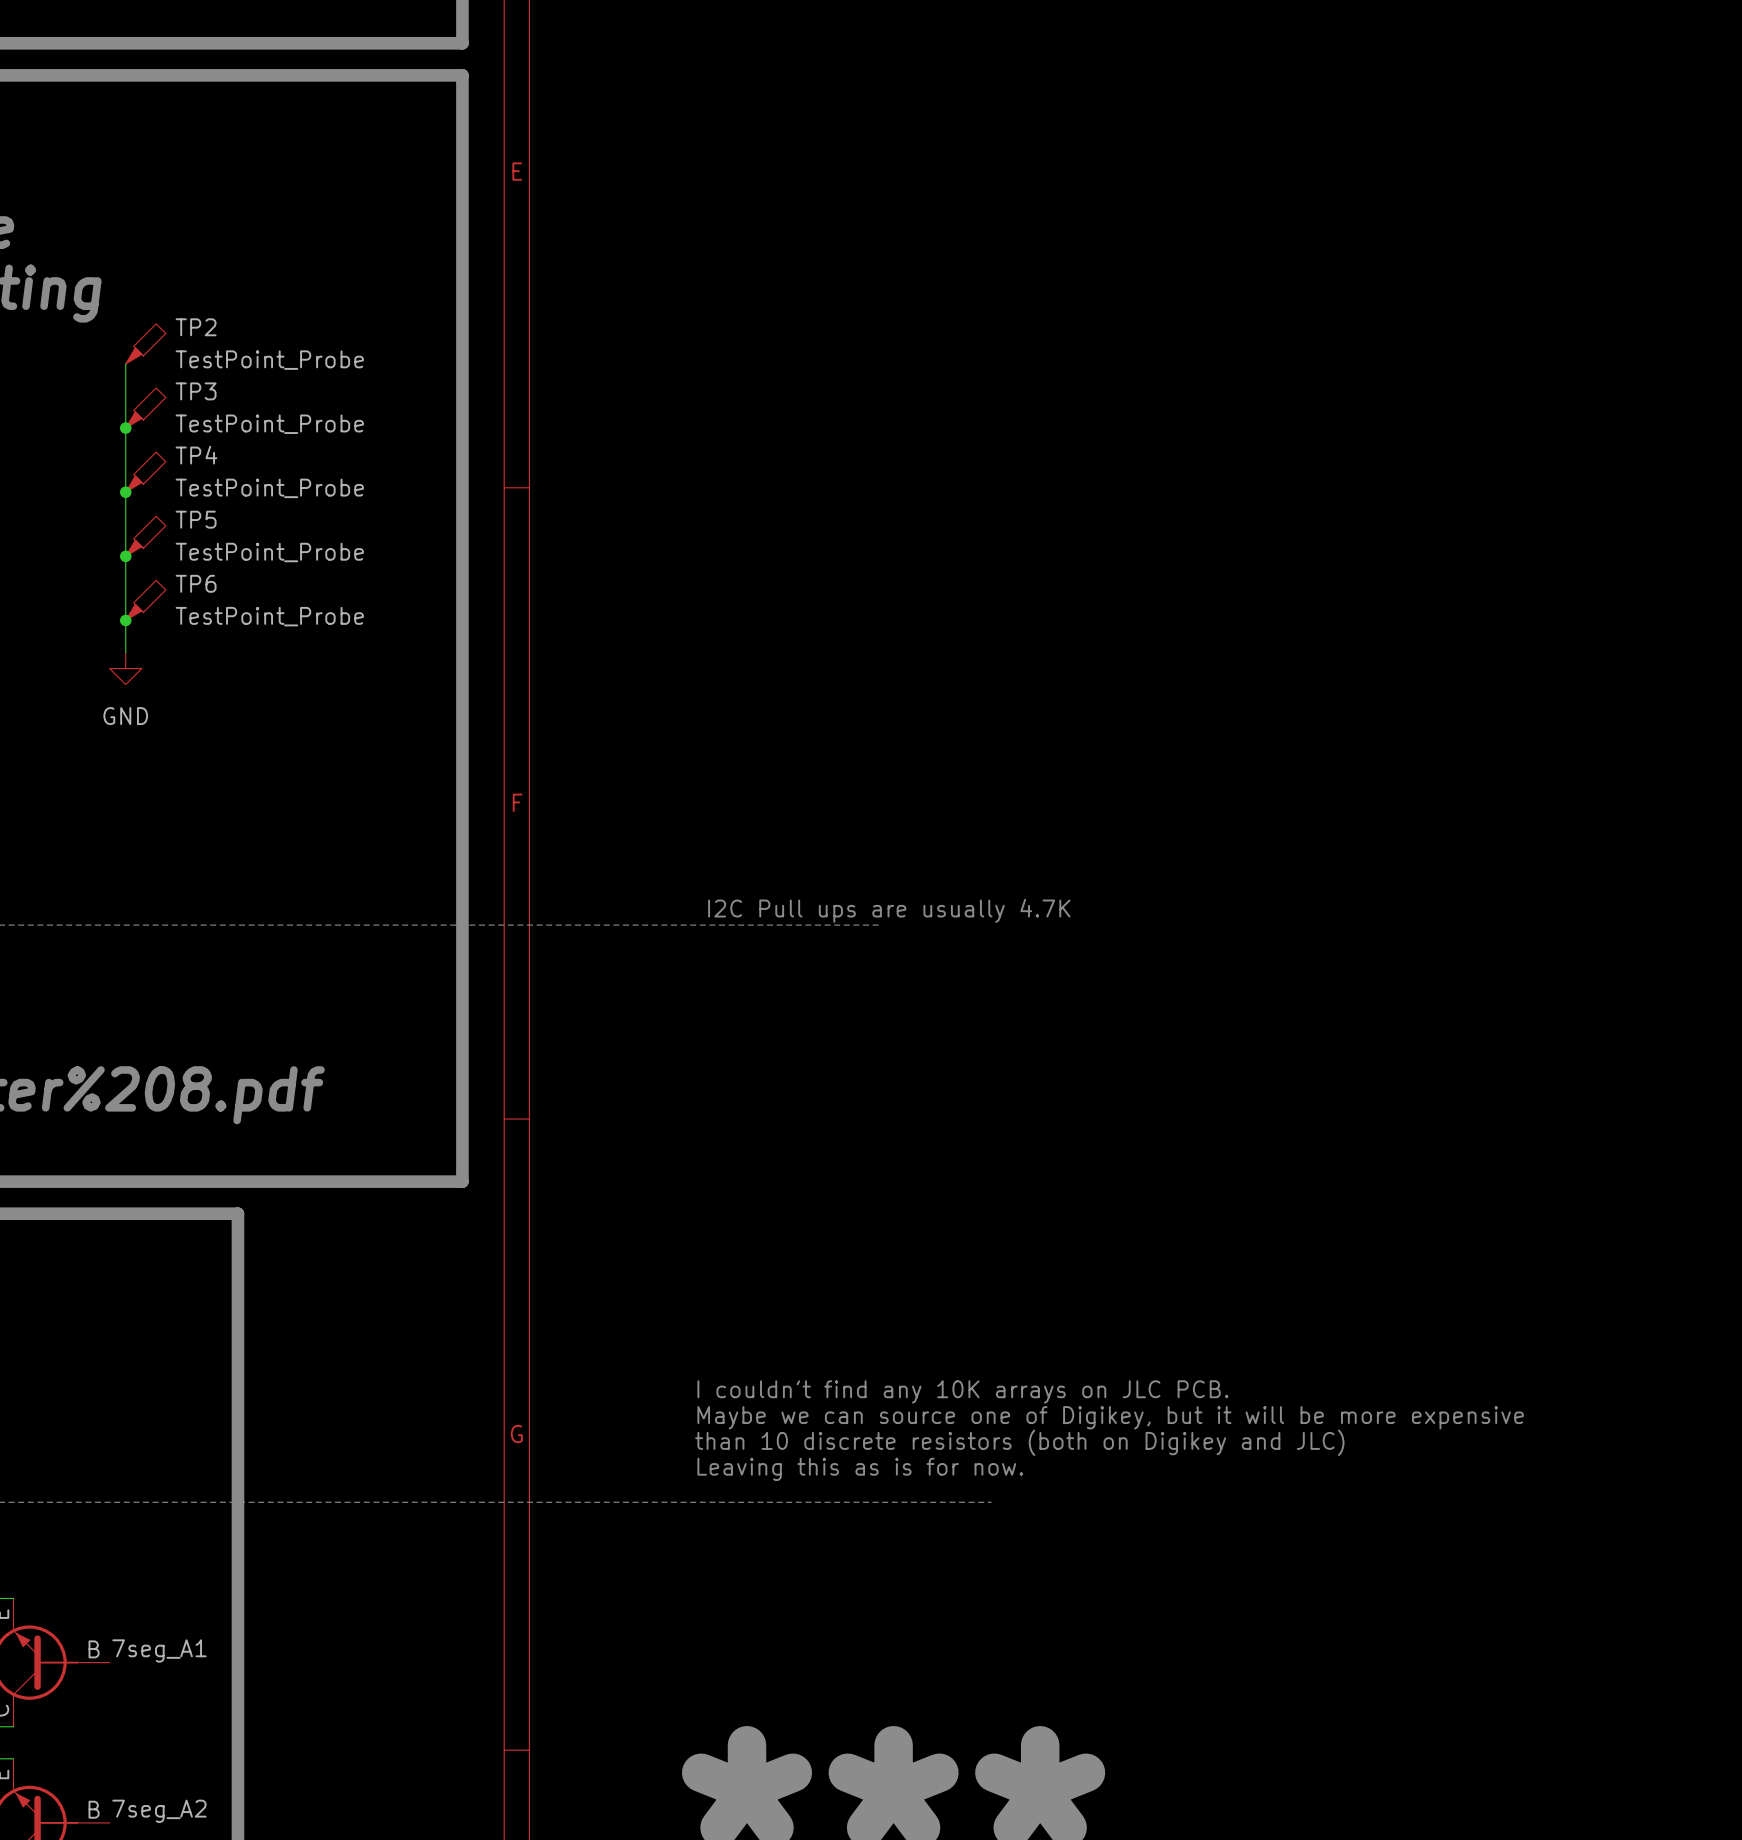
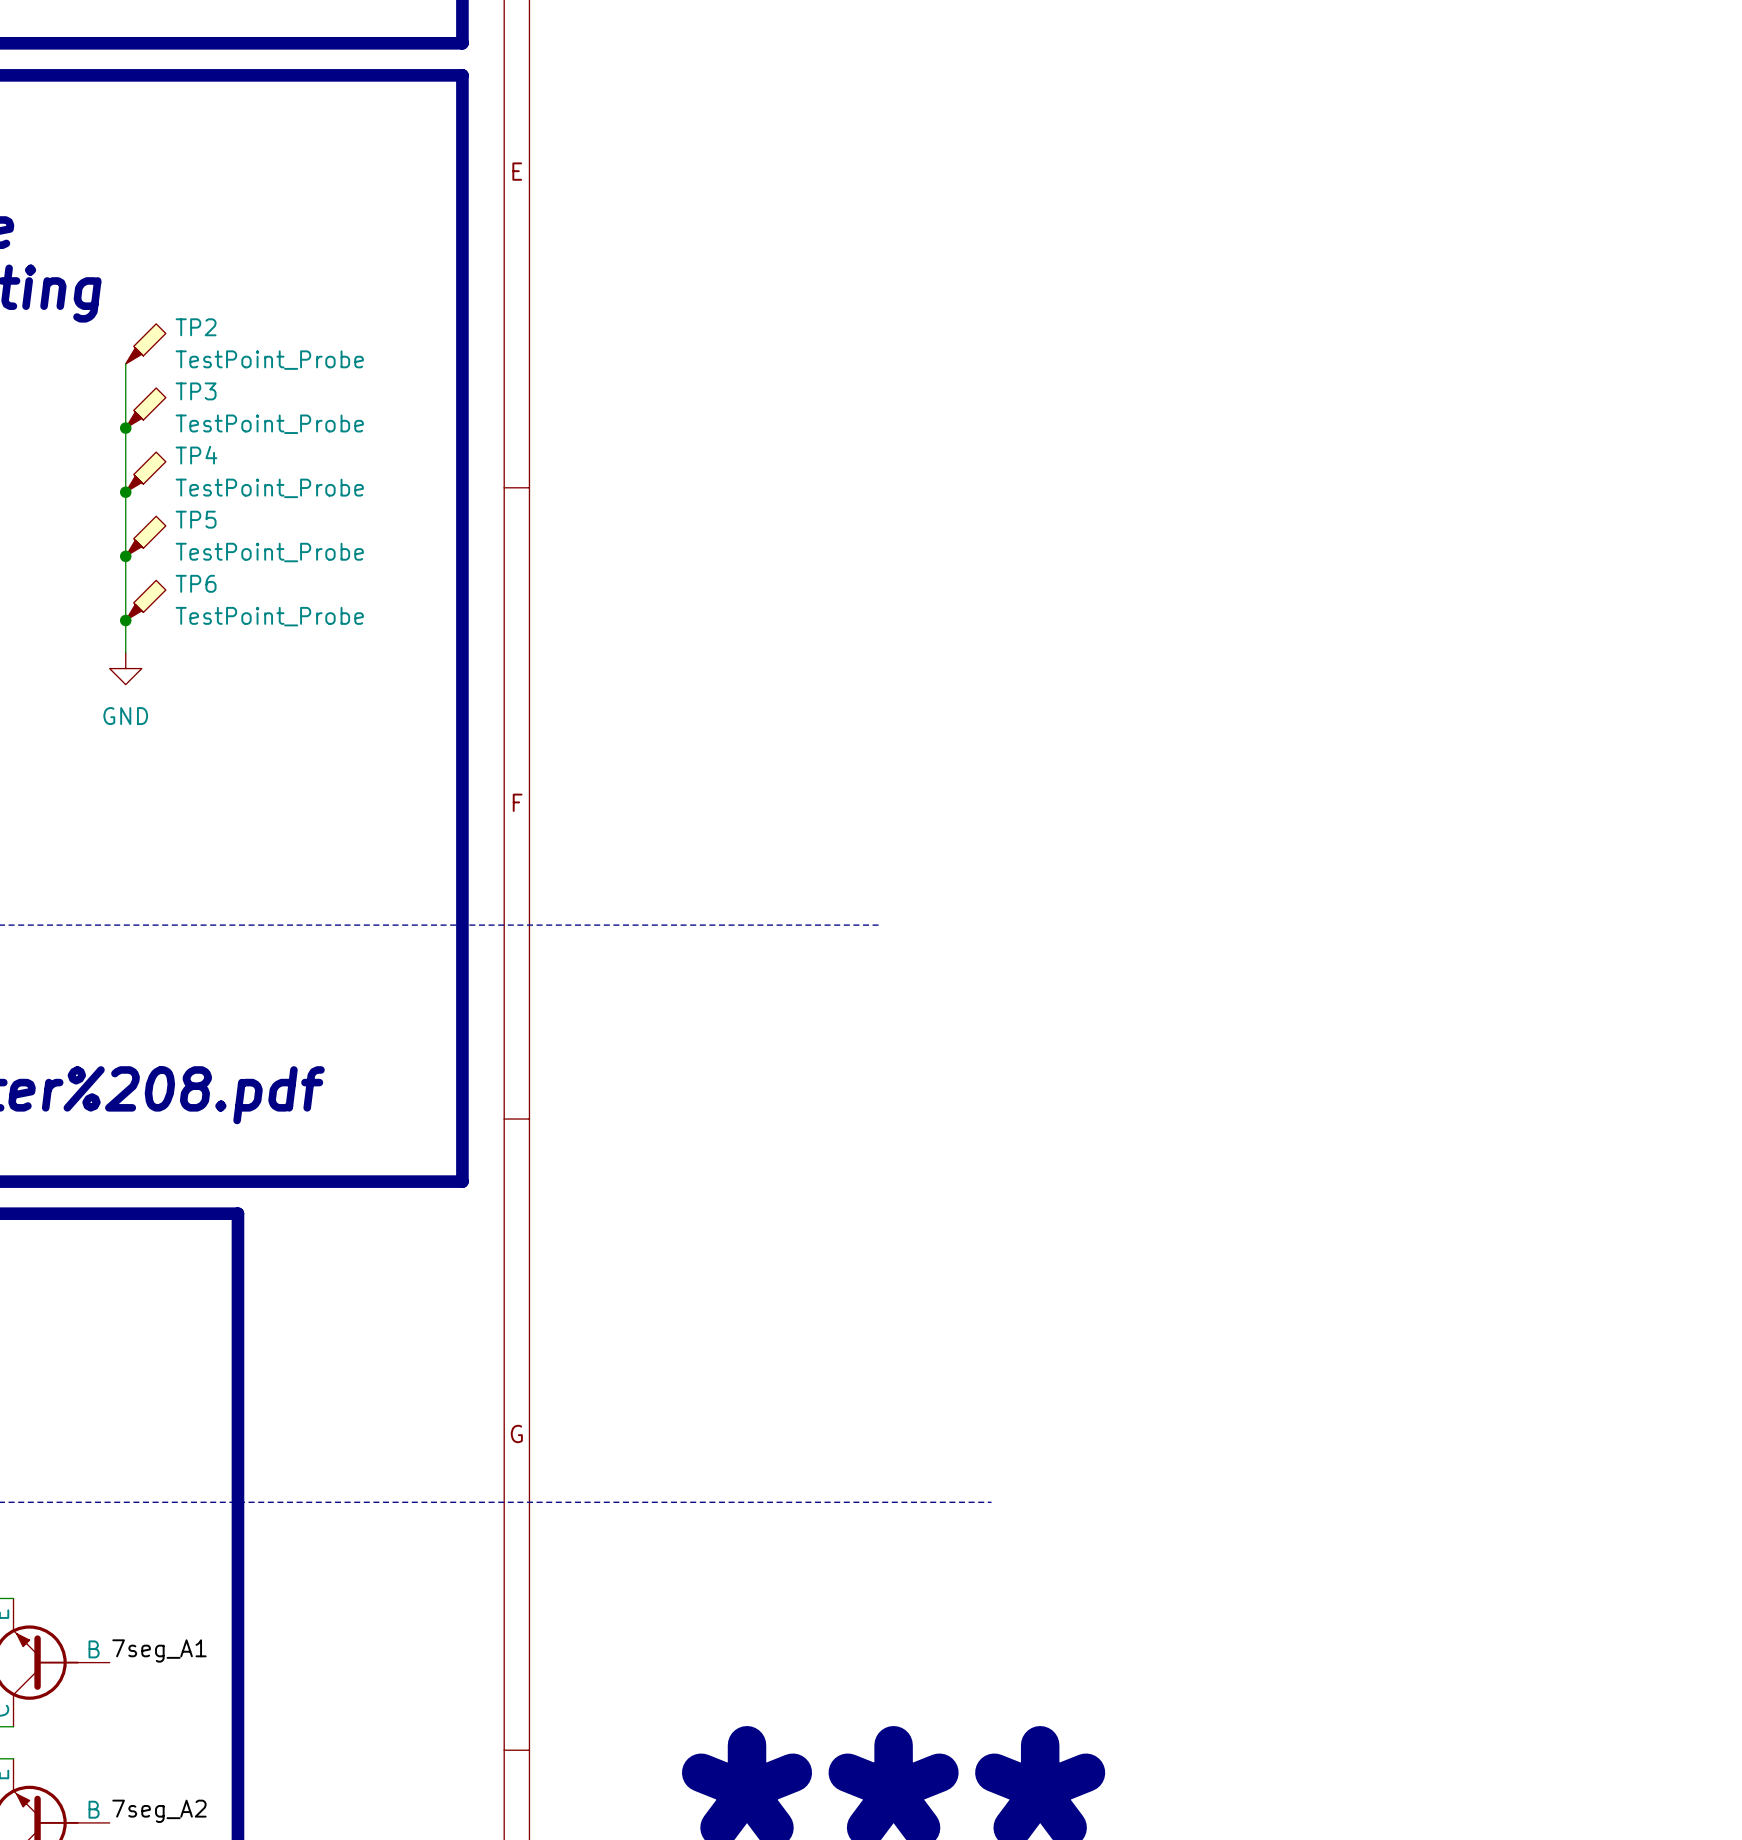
text: I2C Pull ups are usually 4.7K (889, 910) -> none
text: I couldn't find any 10K arrays on JLC PCB. (962, 1391) -> none
text: Maybe we can source one of Digikey, but it will be more expensive (1110, 1417) -> none
text: than 10 discrete resistors (both on Digikey and JLC) (1019, 1442) -> none
text: Leaving this as is for now. (860, 1469) -> none

